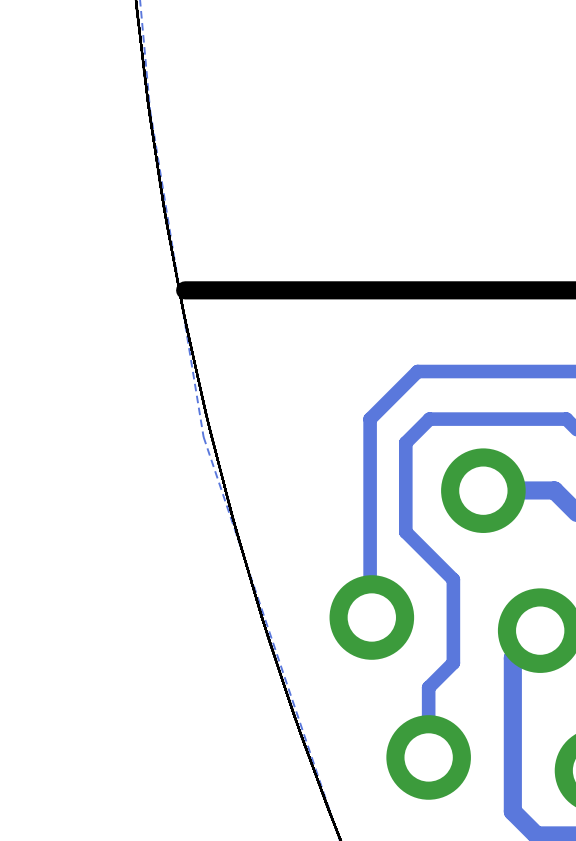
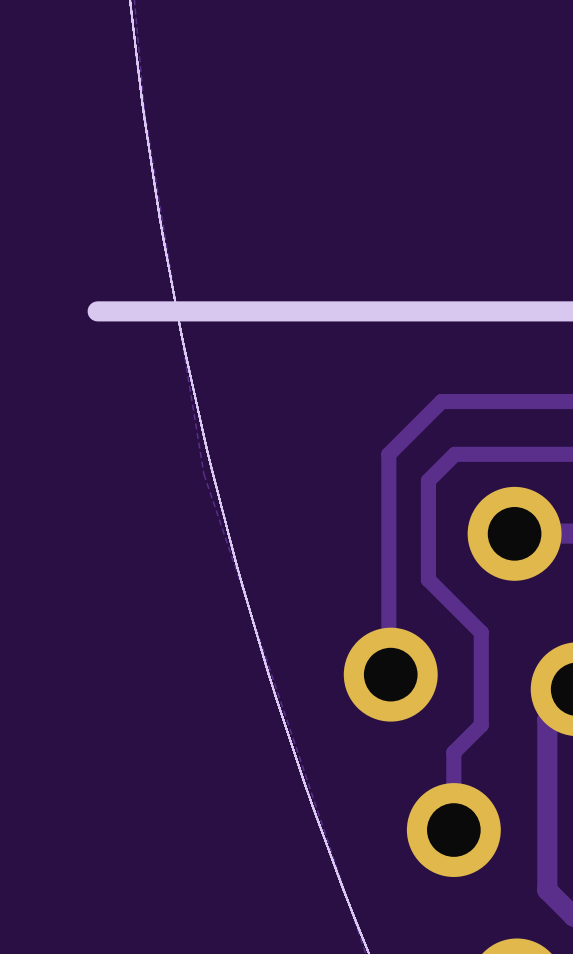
board edge: none -> (183, 311) (97, 311)

